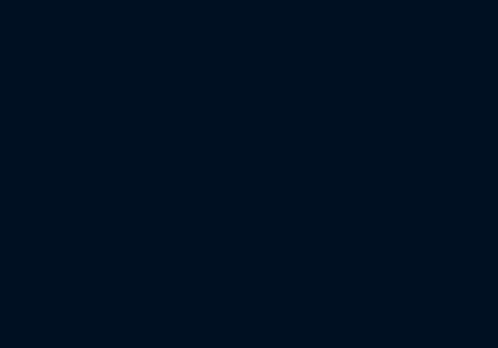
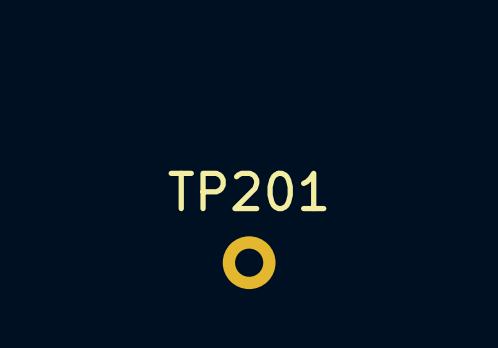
TP201: none -> (249, 262)

